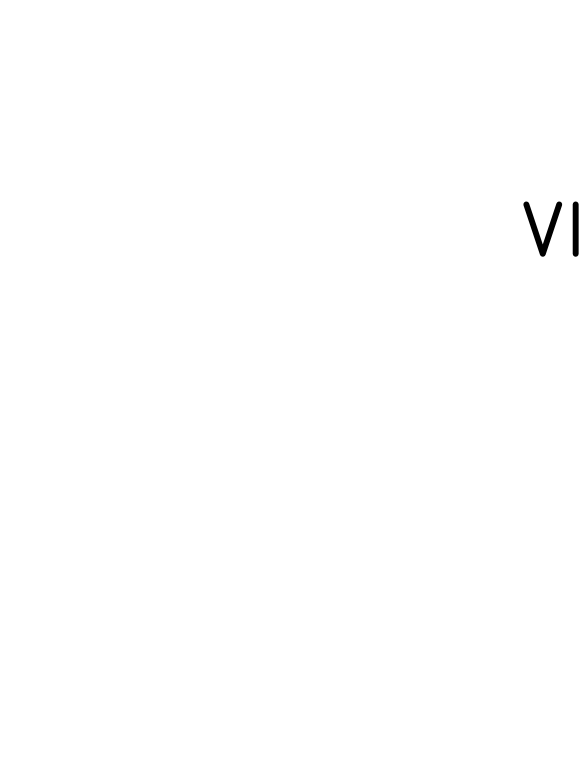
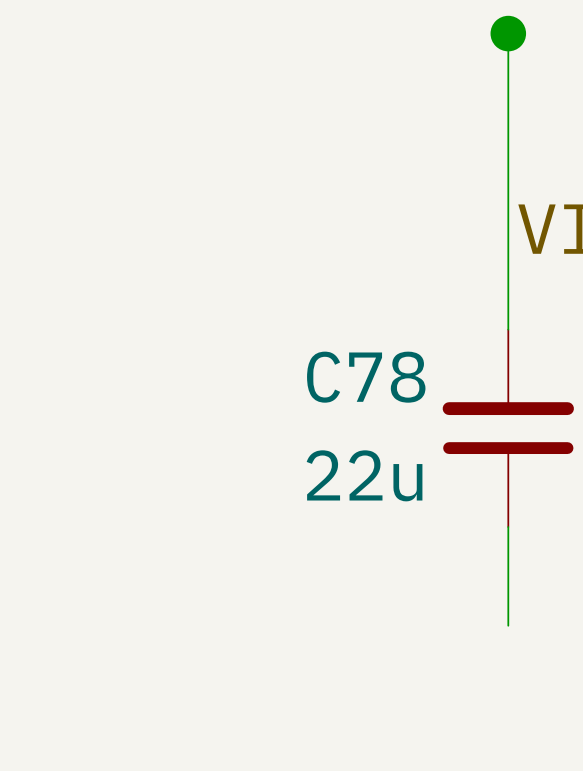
wire: none -> (508, 33) (508, 329)
junction: none -> (508, 33)
C78: none -> (508, 428)
wire: none -> (508, 527) (508, 625)

